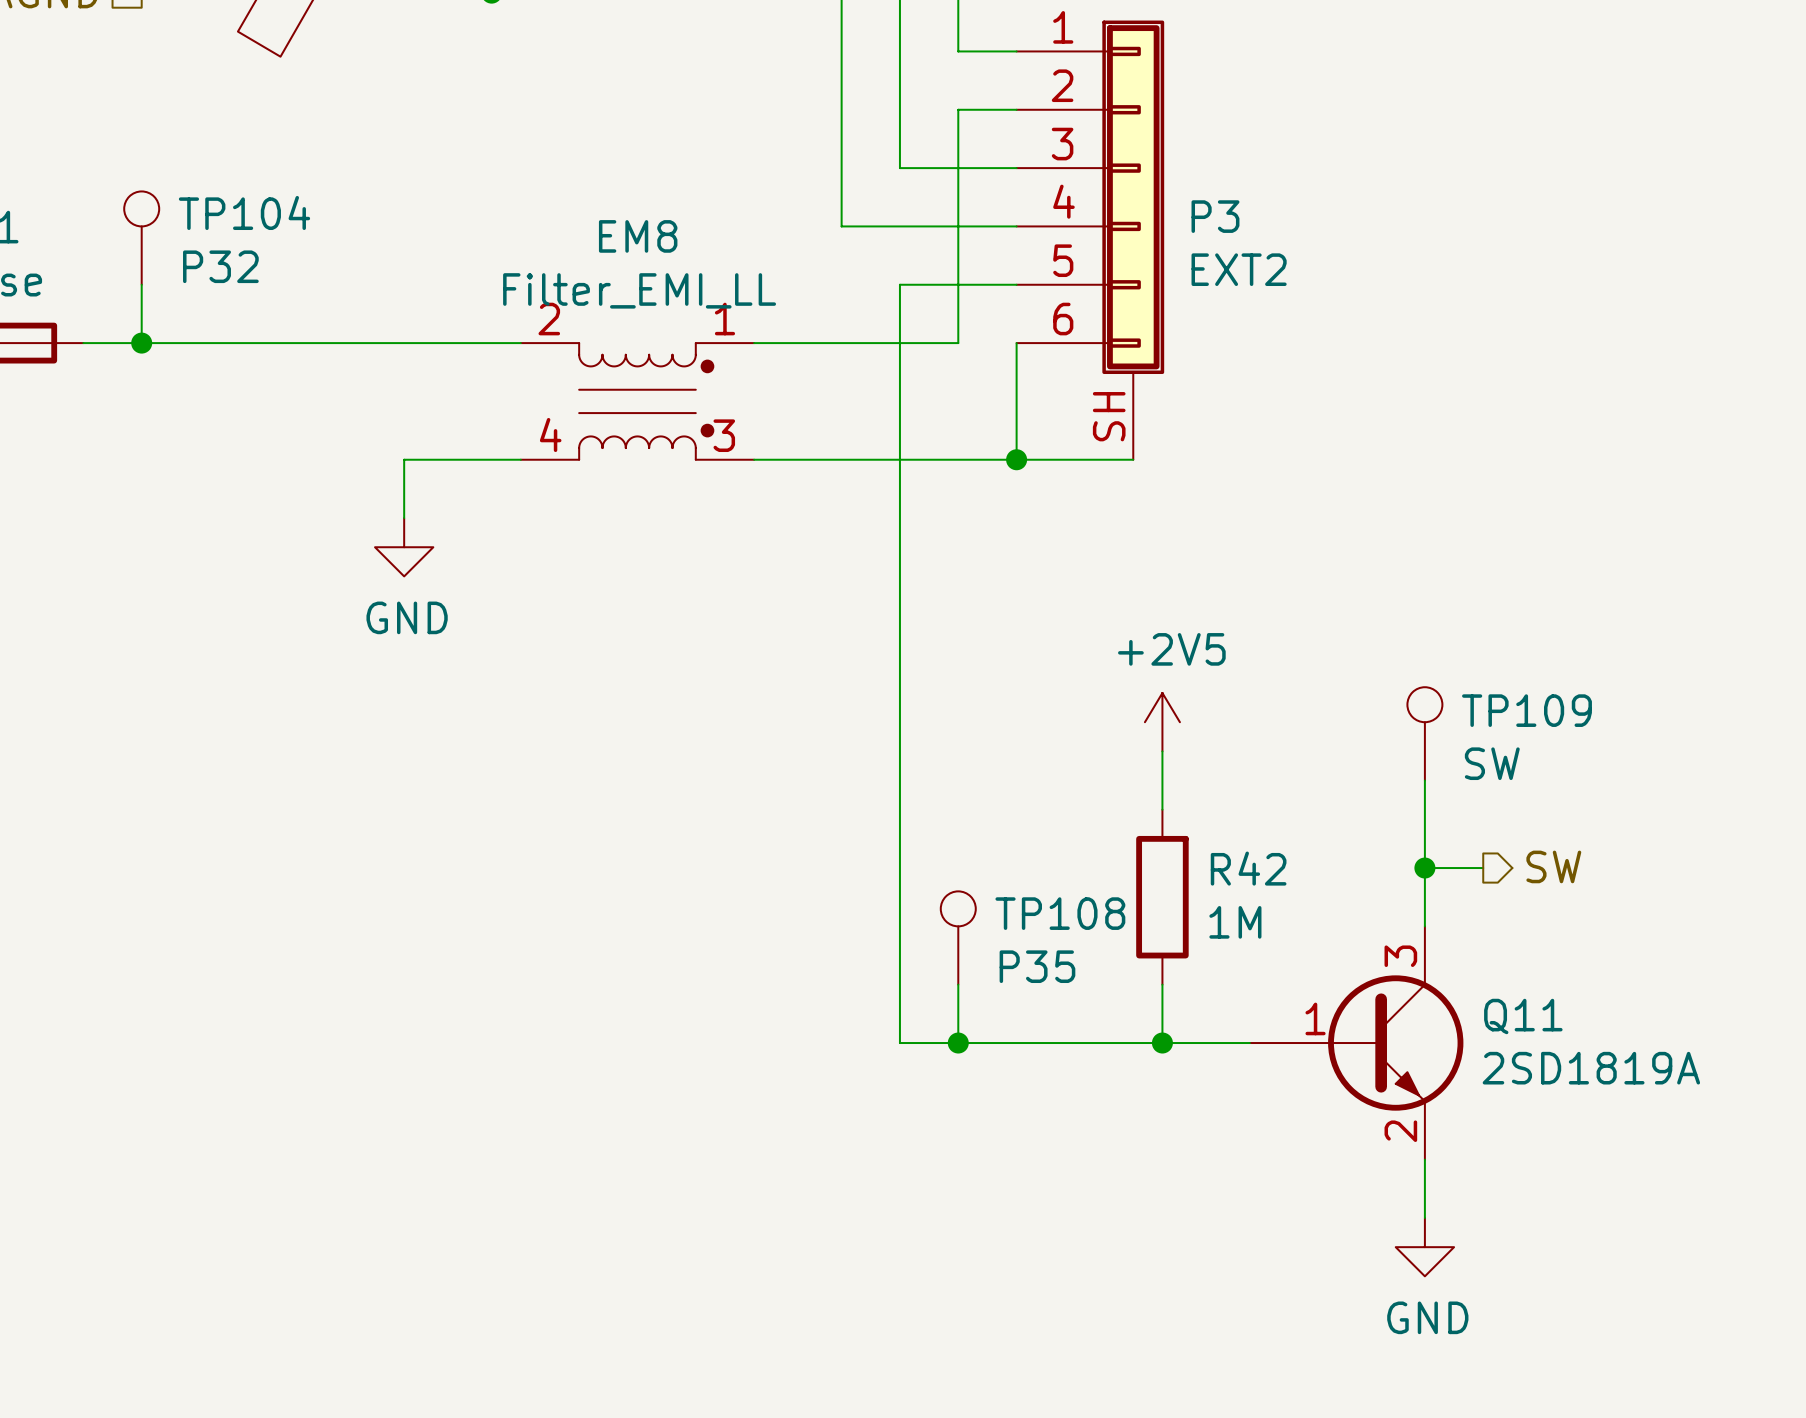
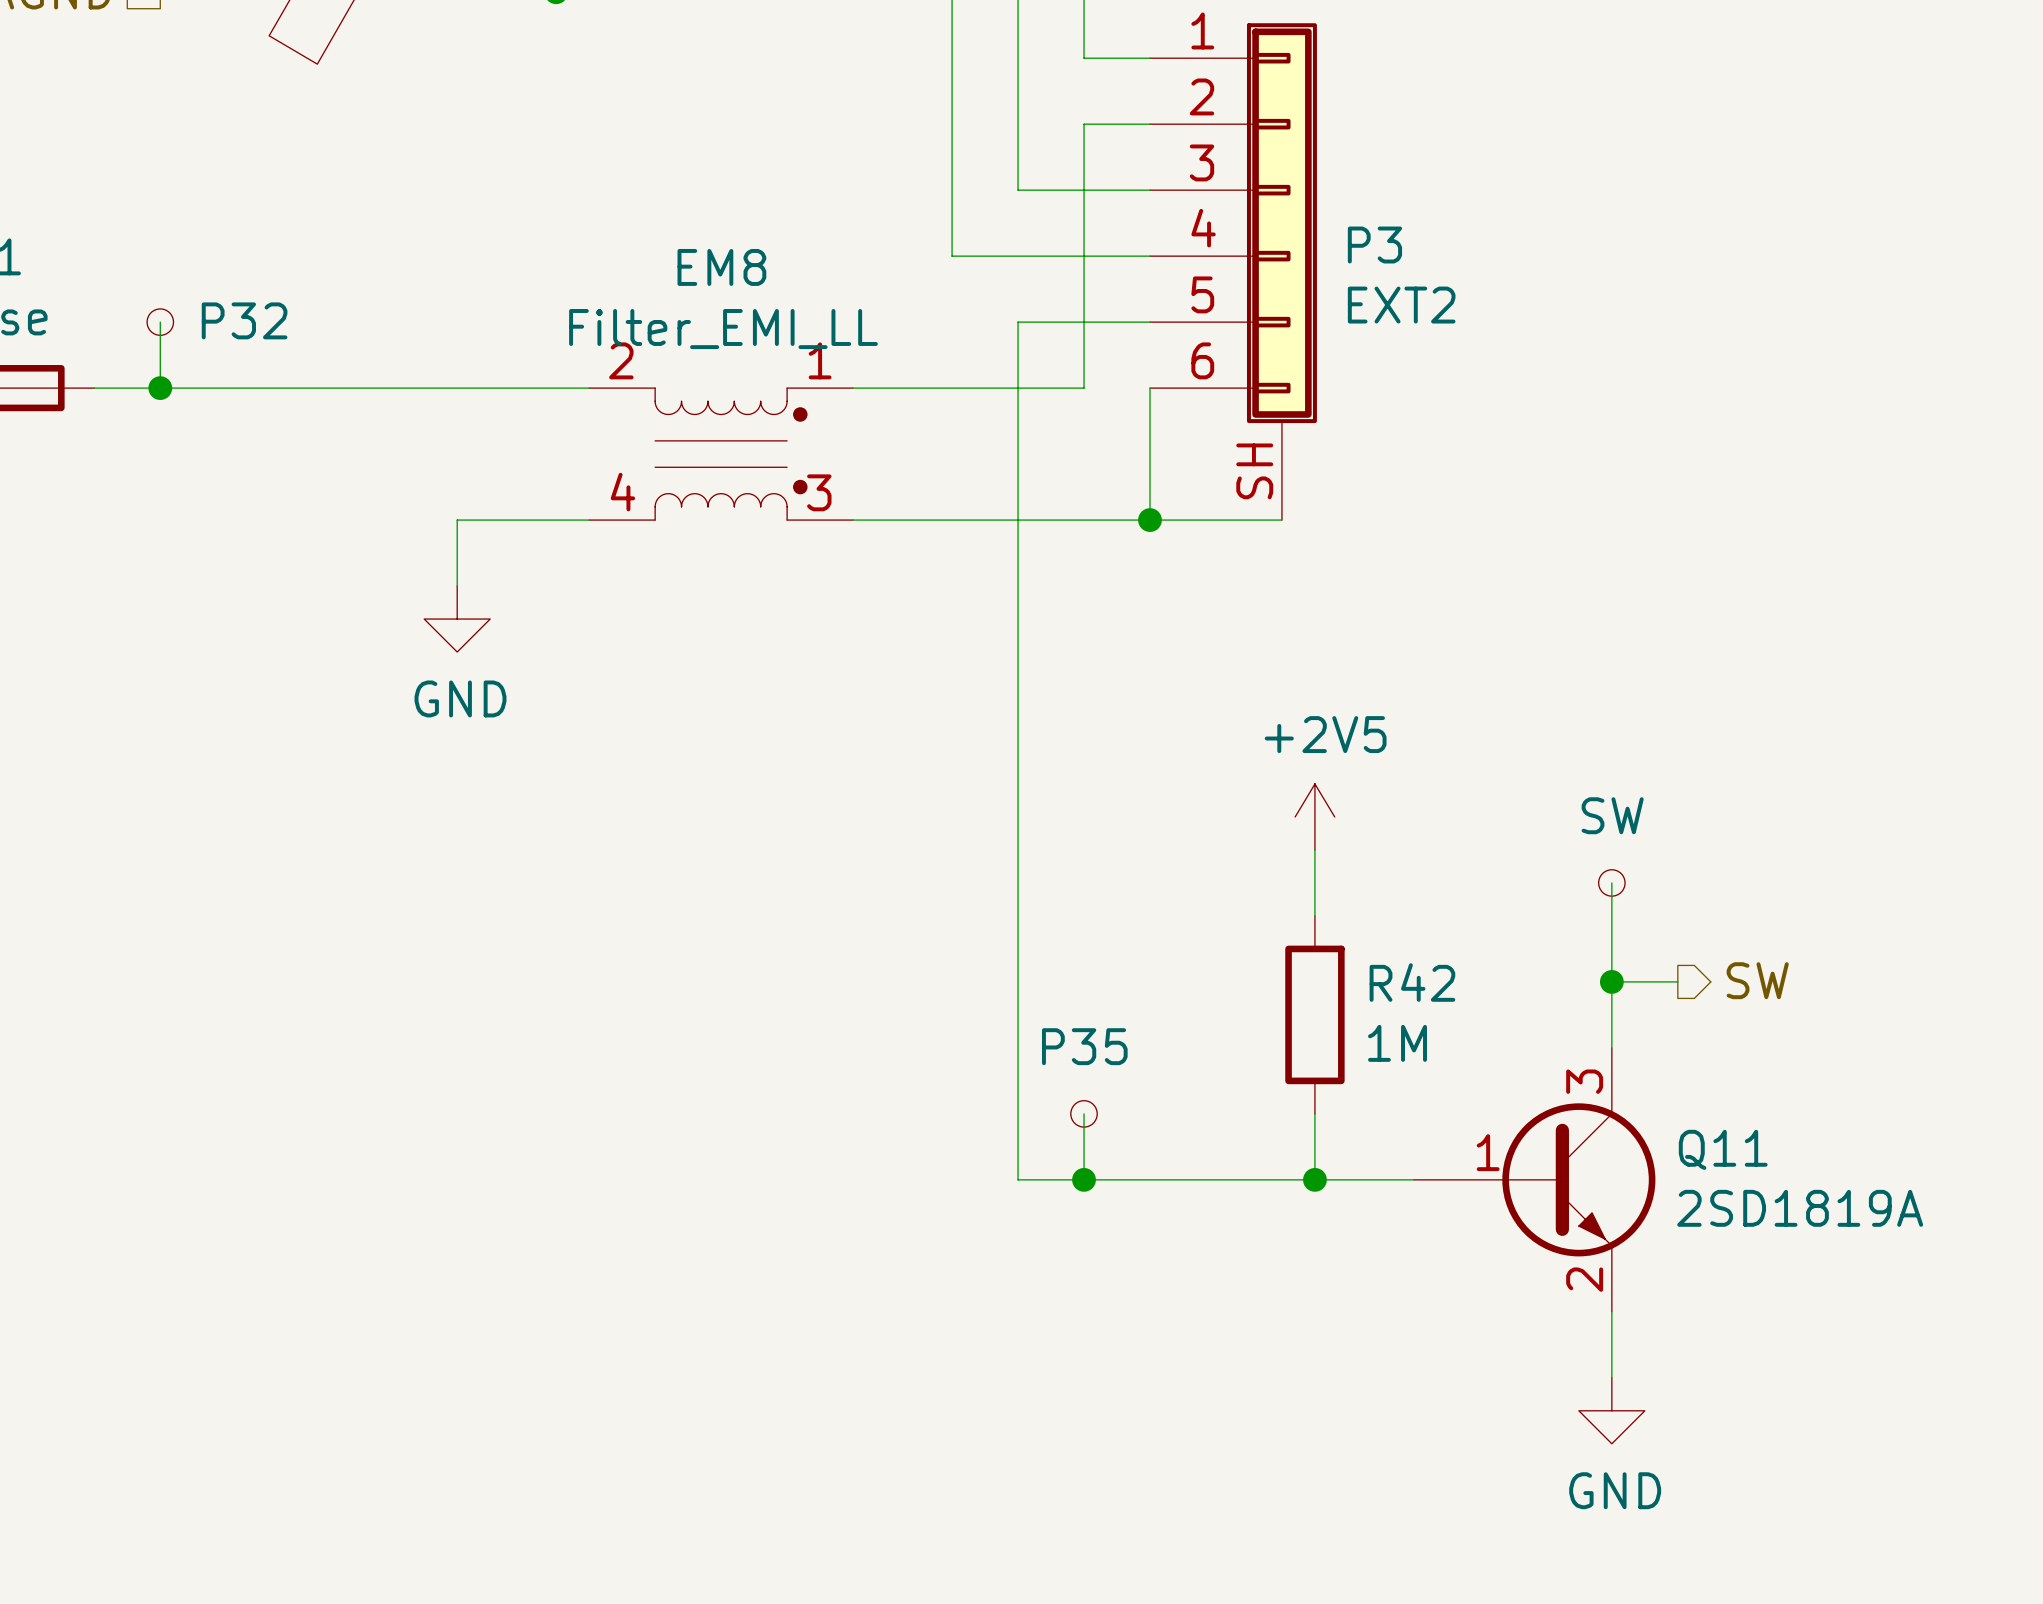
TP104: P32 (141, 238) -> none
part: none -> P32 (160, 322)
TP109: SW (1424, 733) -> none
part: none -> SW (1611, 882)
TP108: P35 (958, 938) -> none
part: none -> P35 (1084, 1113)

